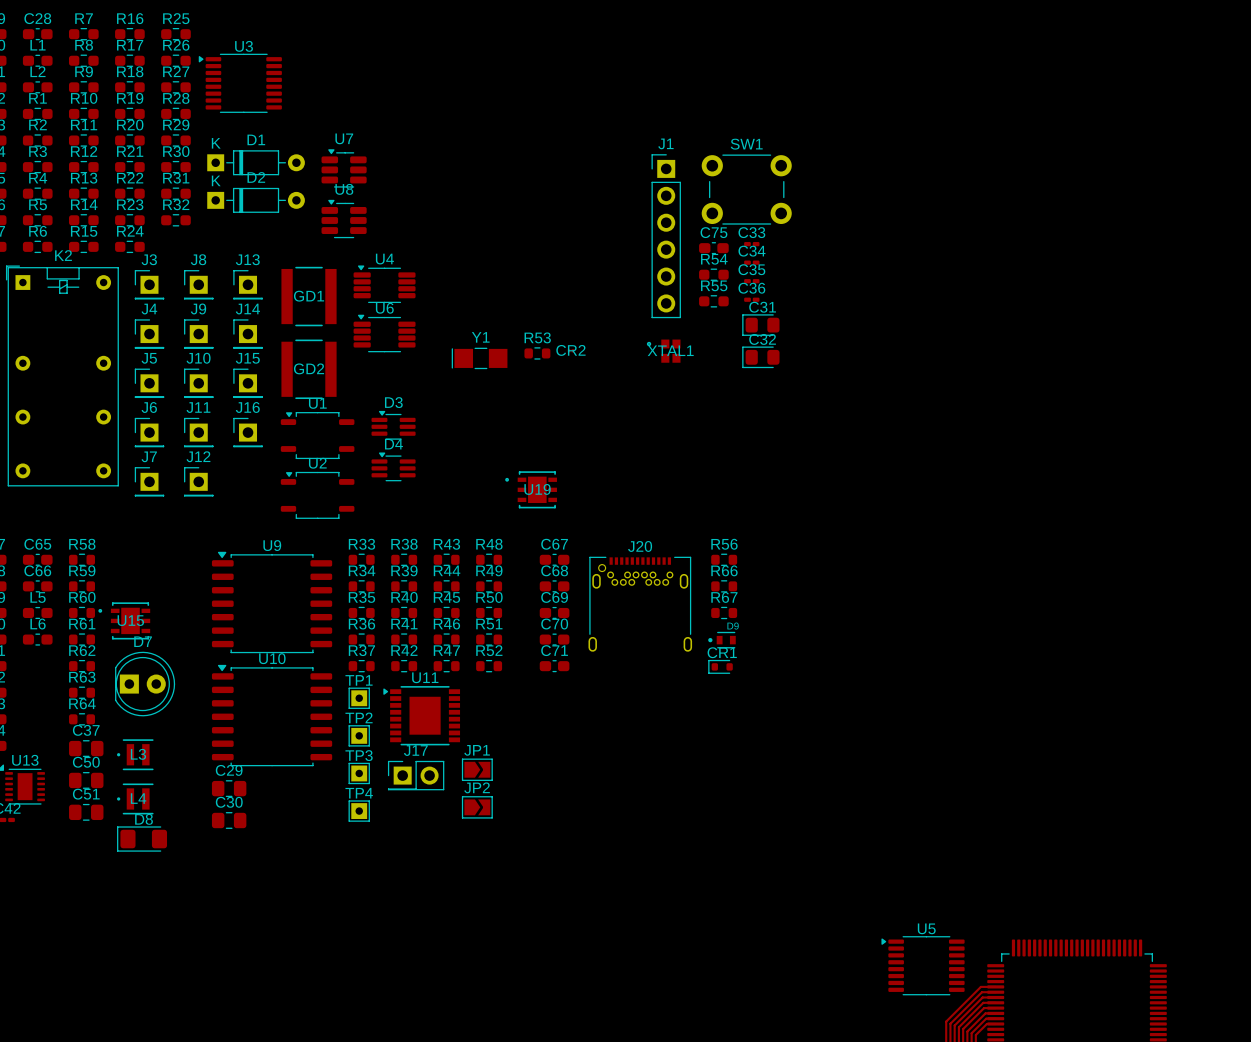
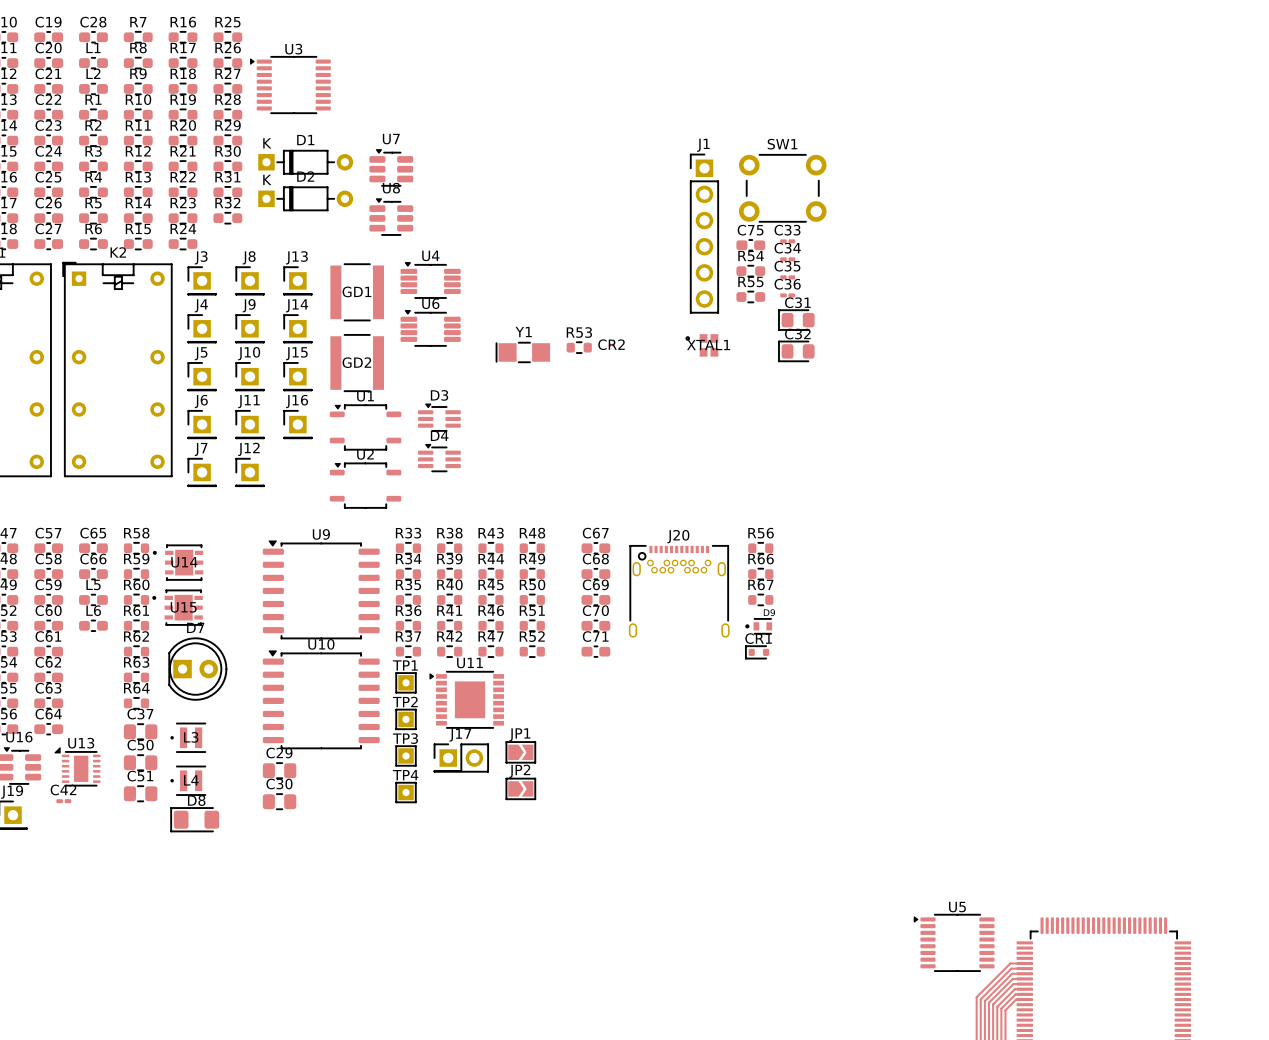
U19: (531, 489) -> none
U14: none -> (178, 562)

